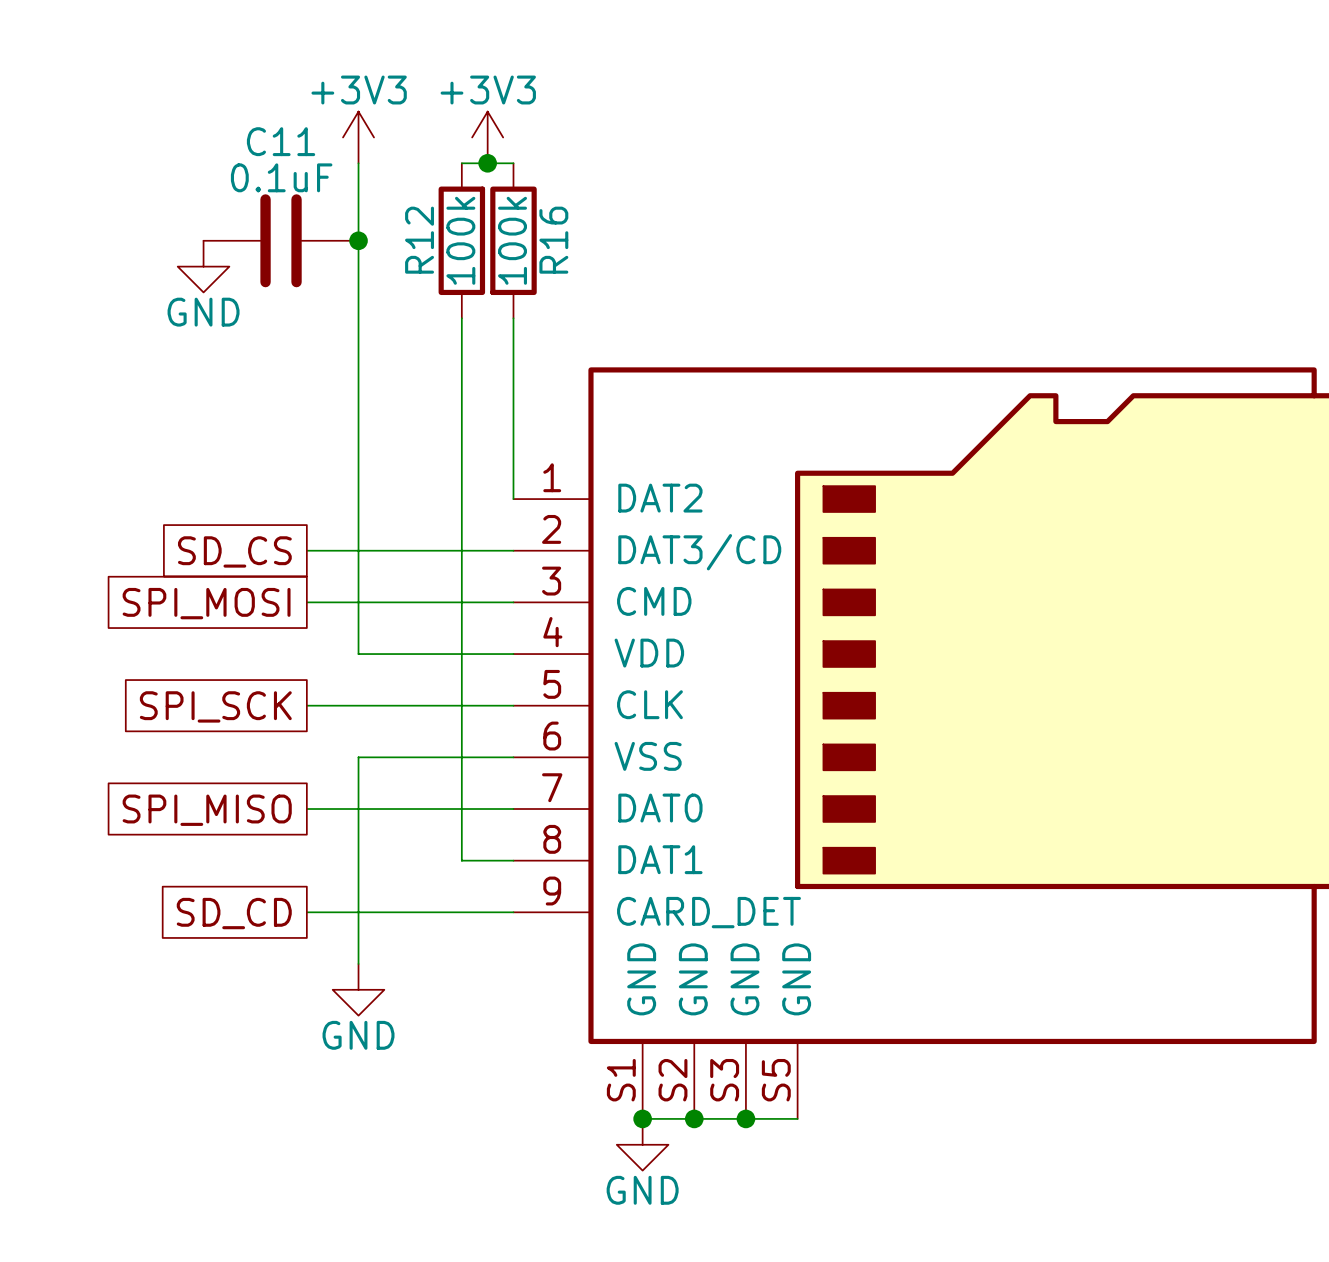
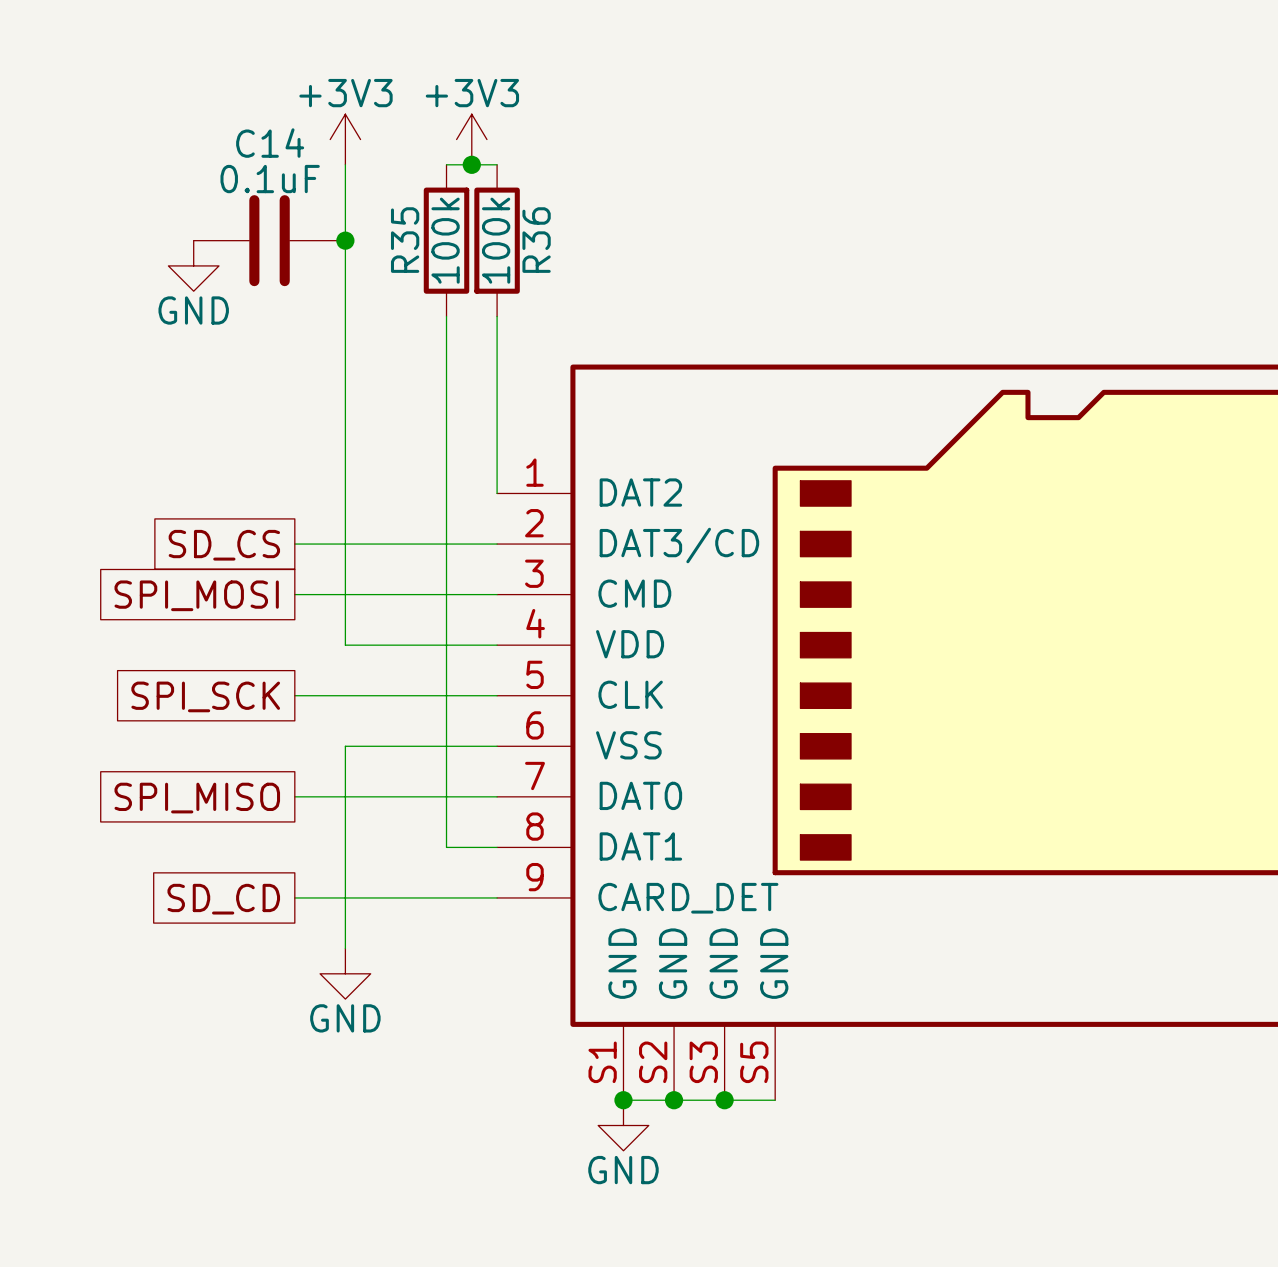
C11 name: C11 (281, 141) -> C14 (270, 143)
R12 name: R12 (419, 240) -> R35 (405, 240)
R16 name: R16 (553, 240) -> R36 (536, 240)

